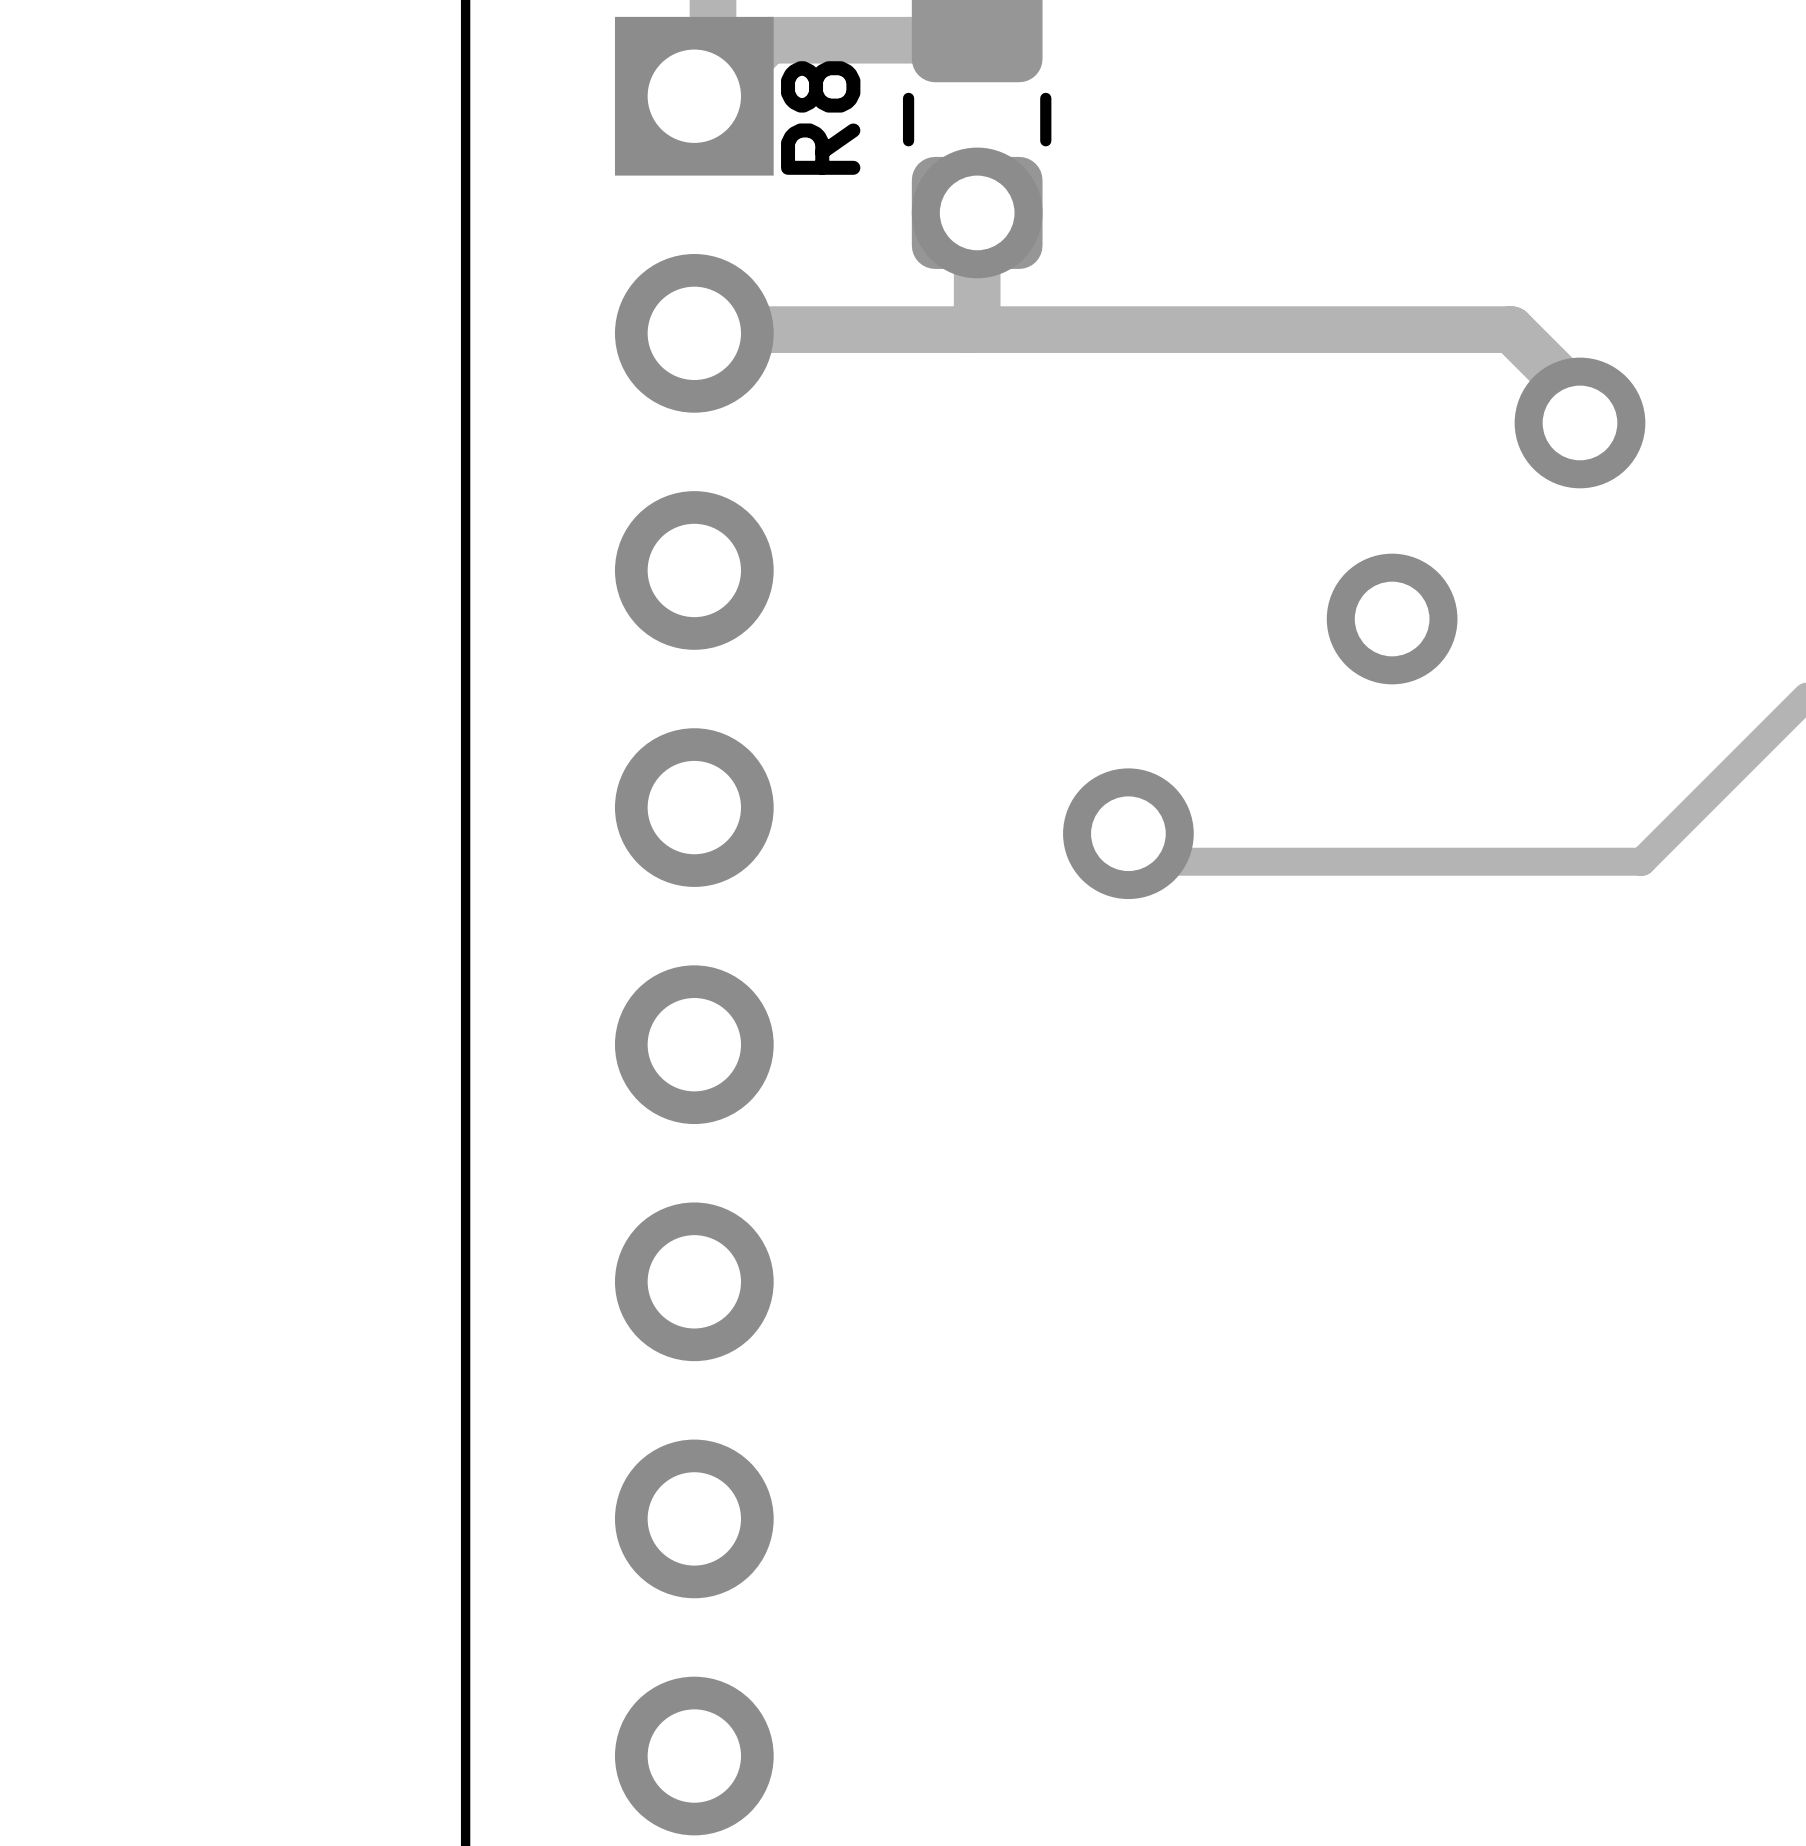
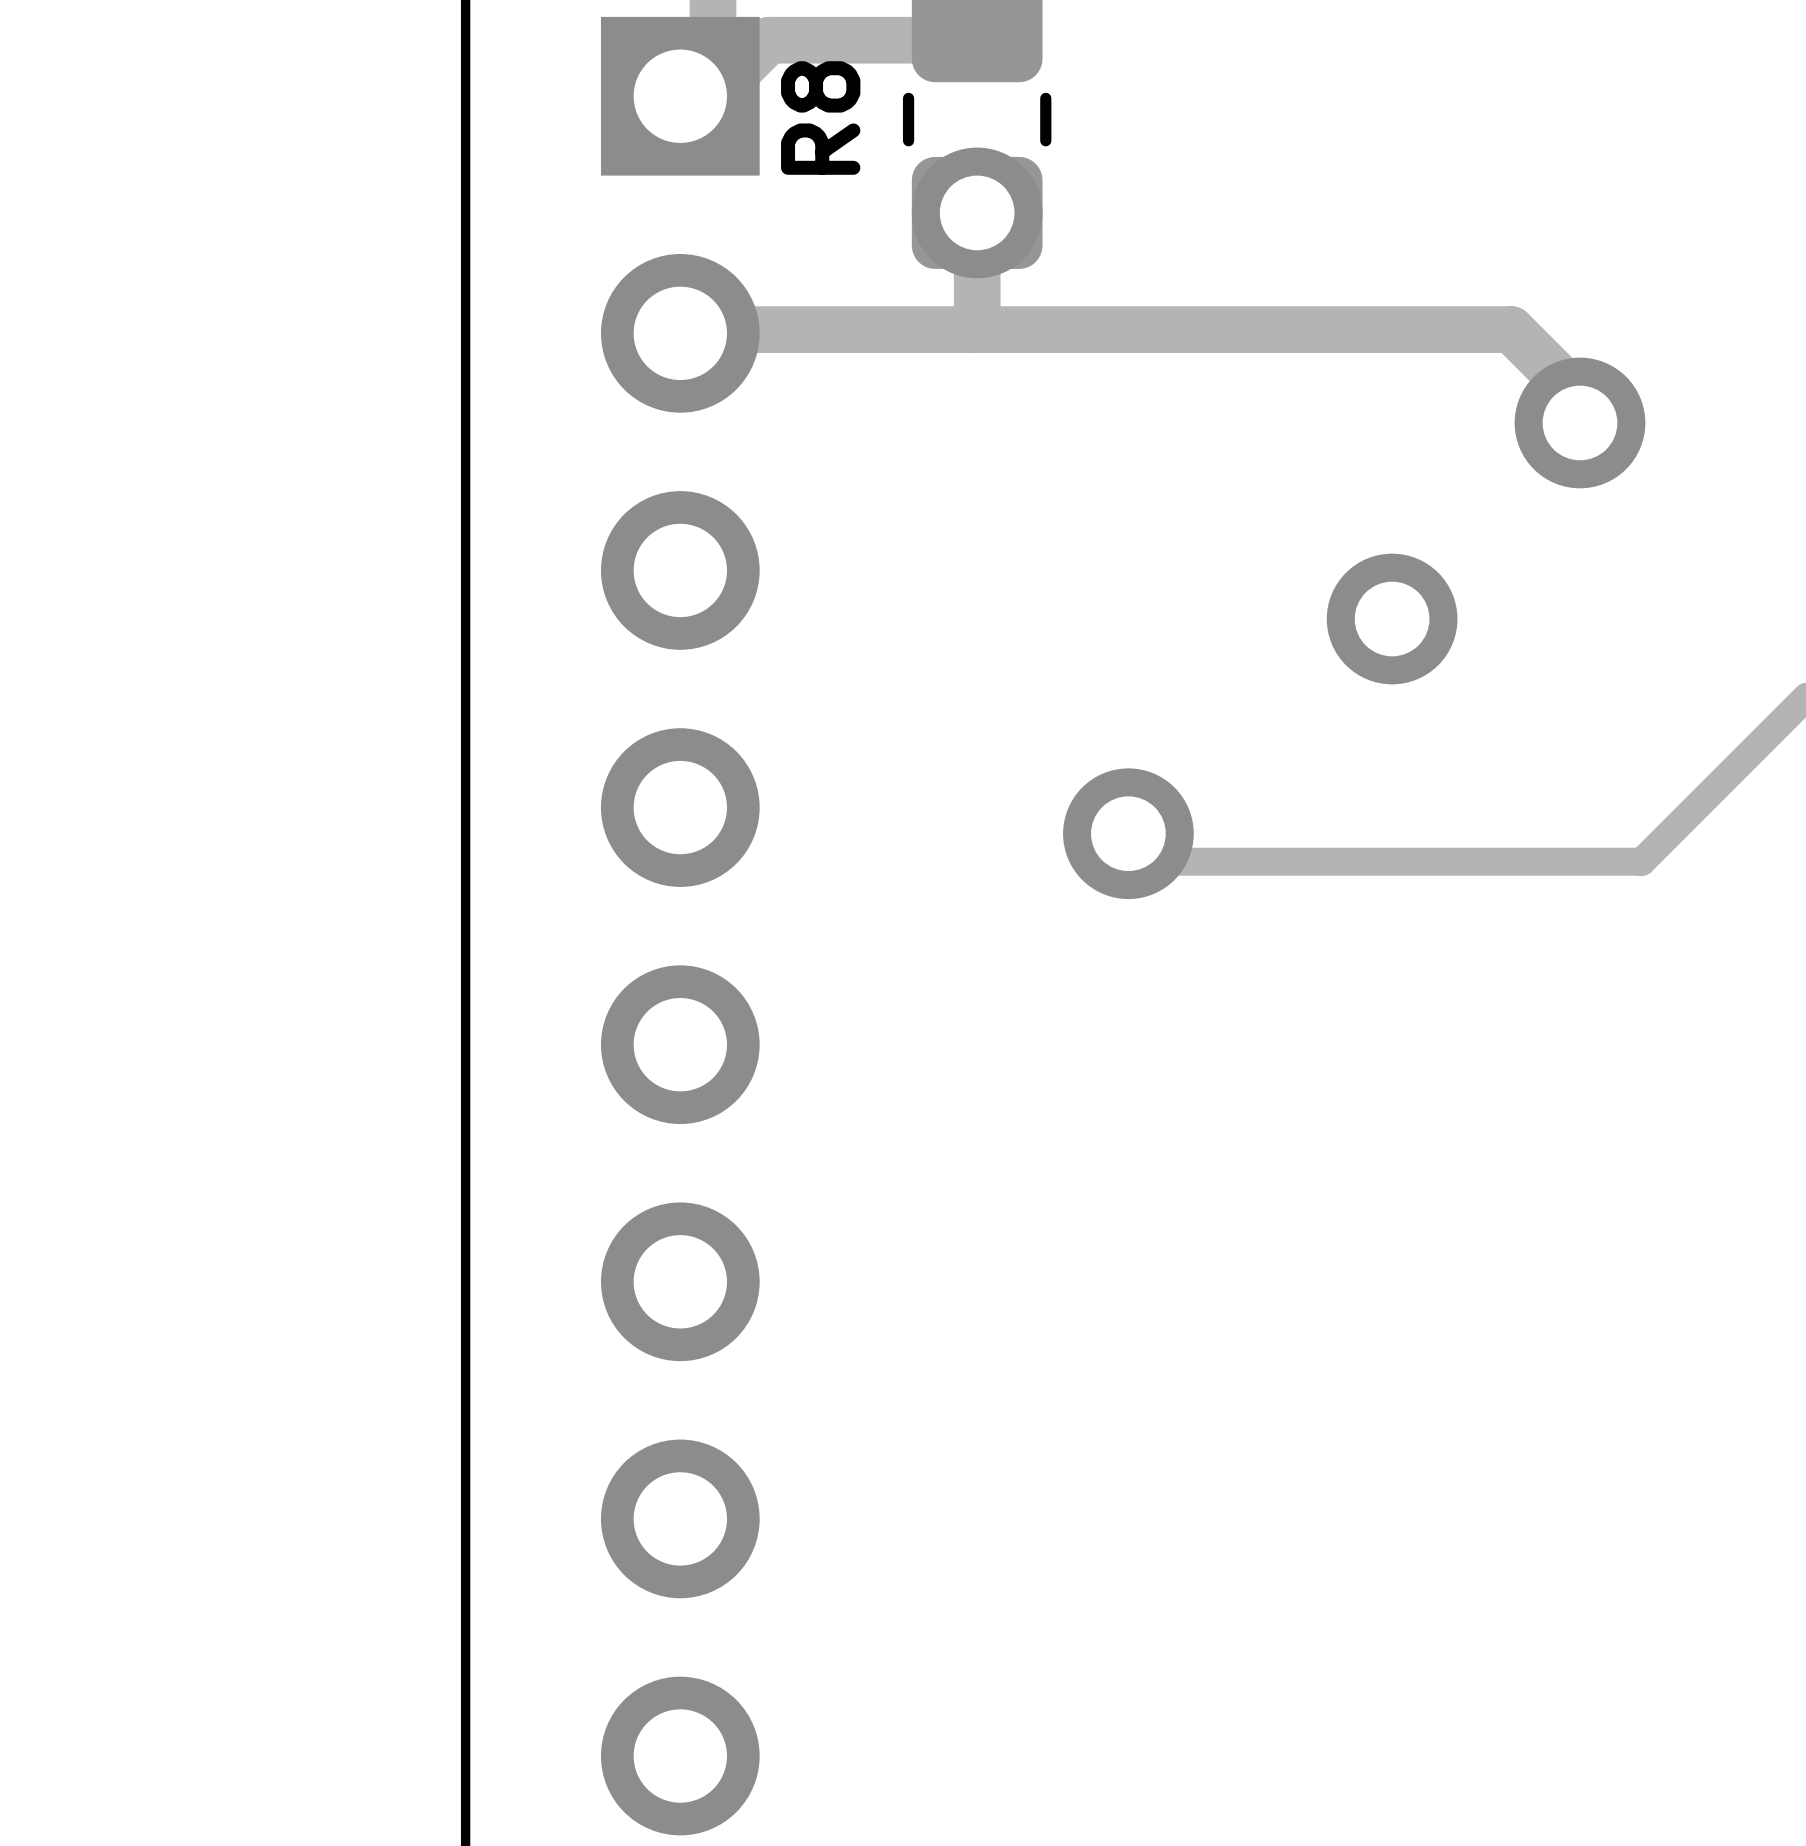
part position: (694, 926) -> (680, 926)

